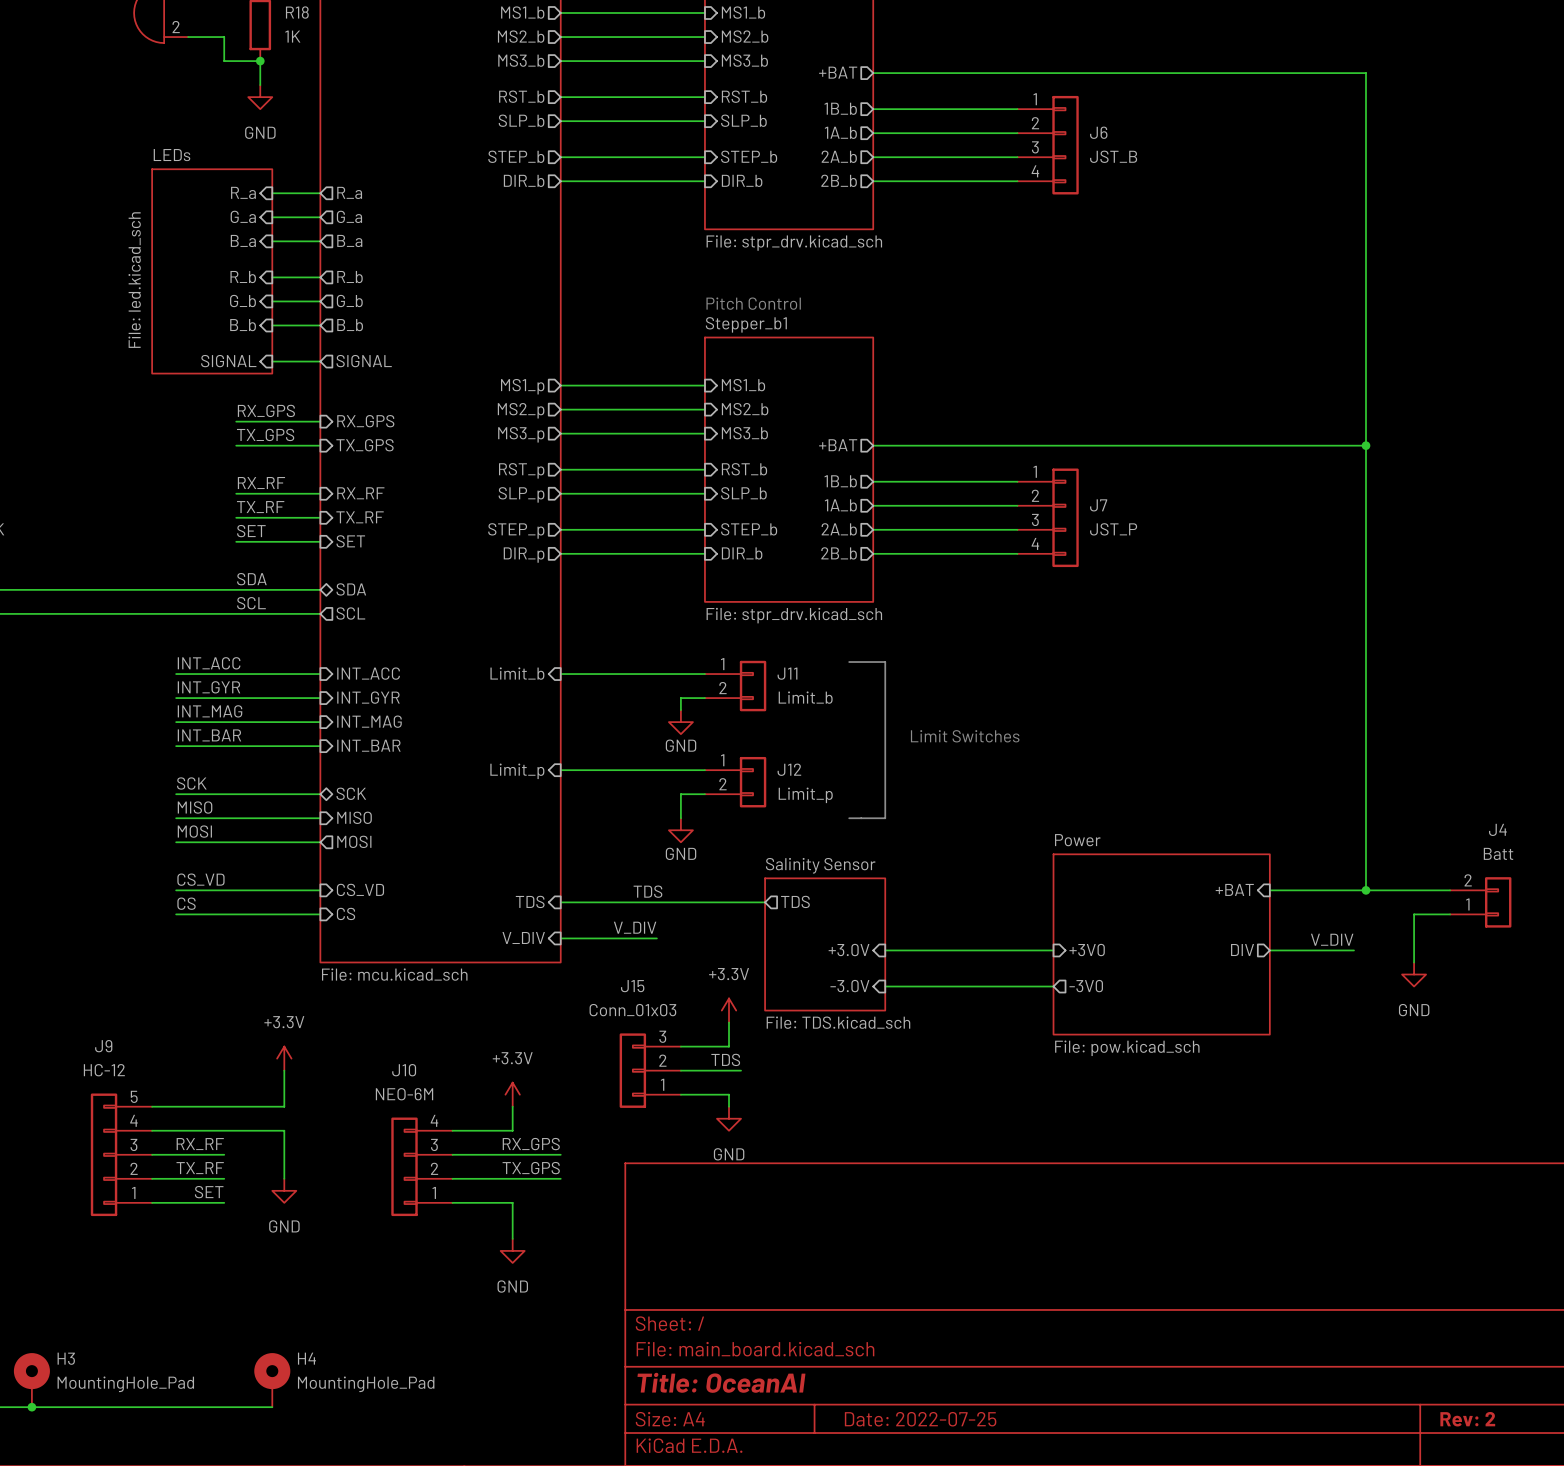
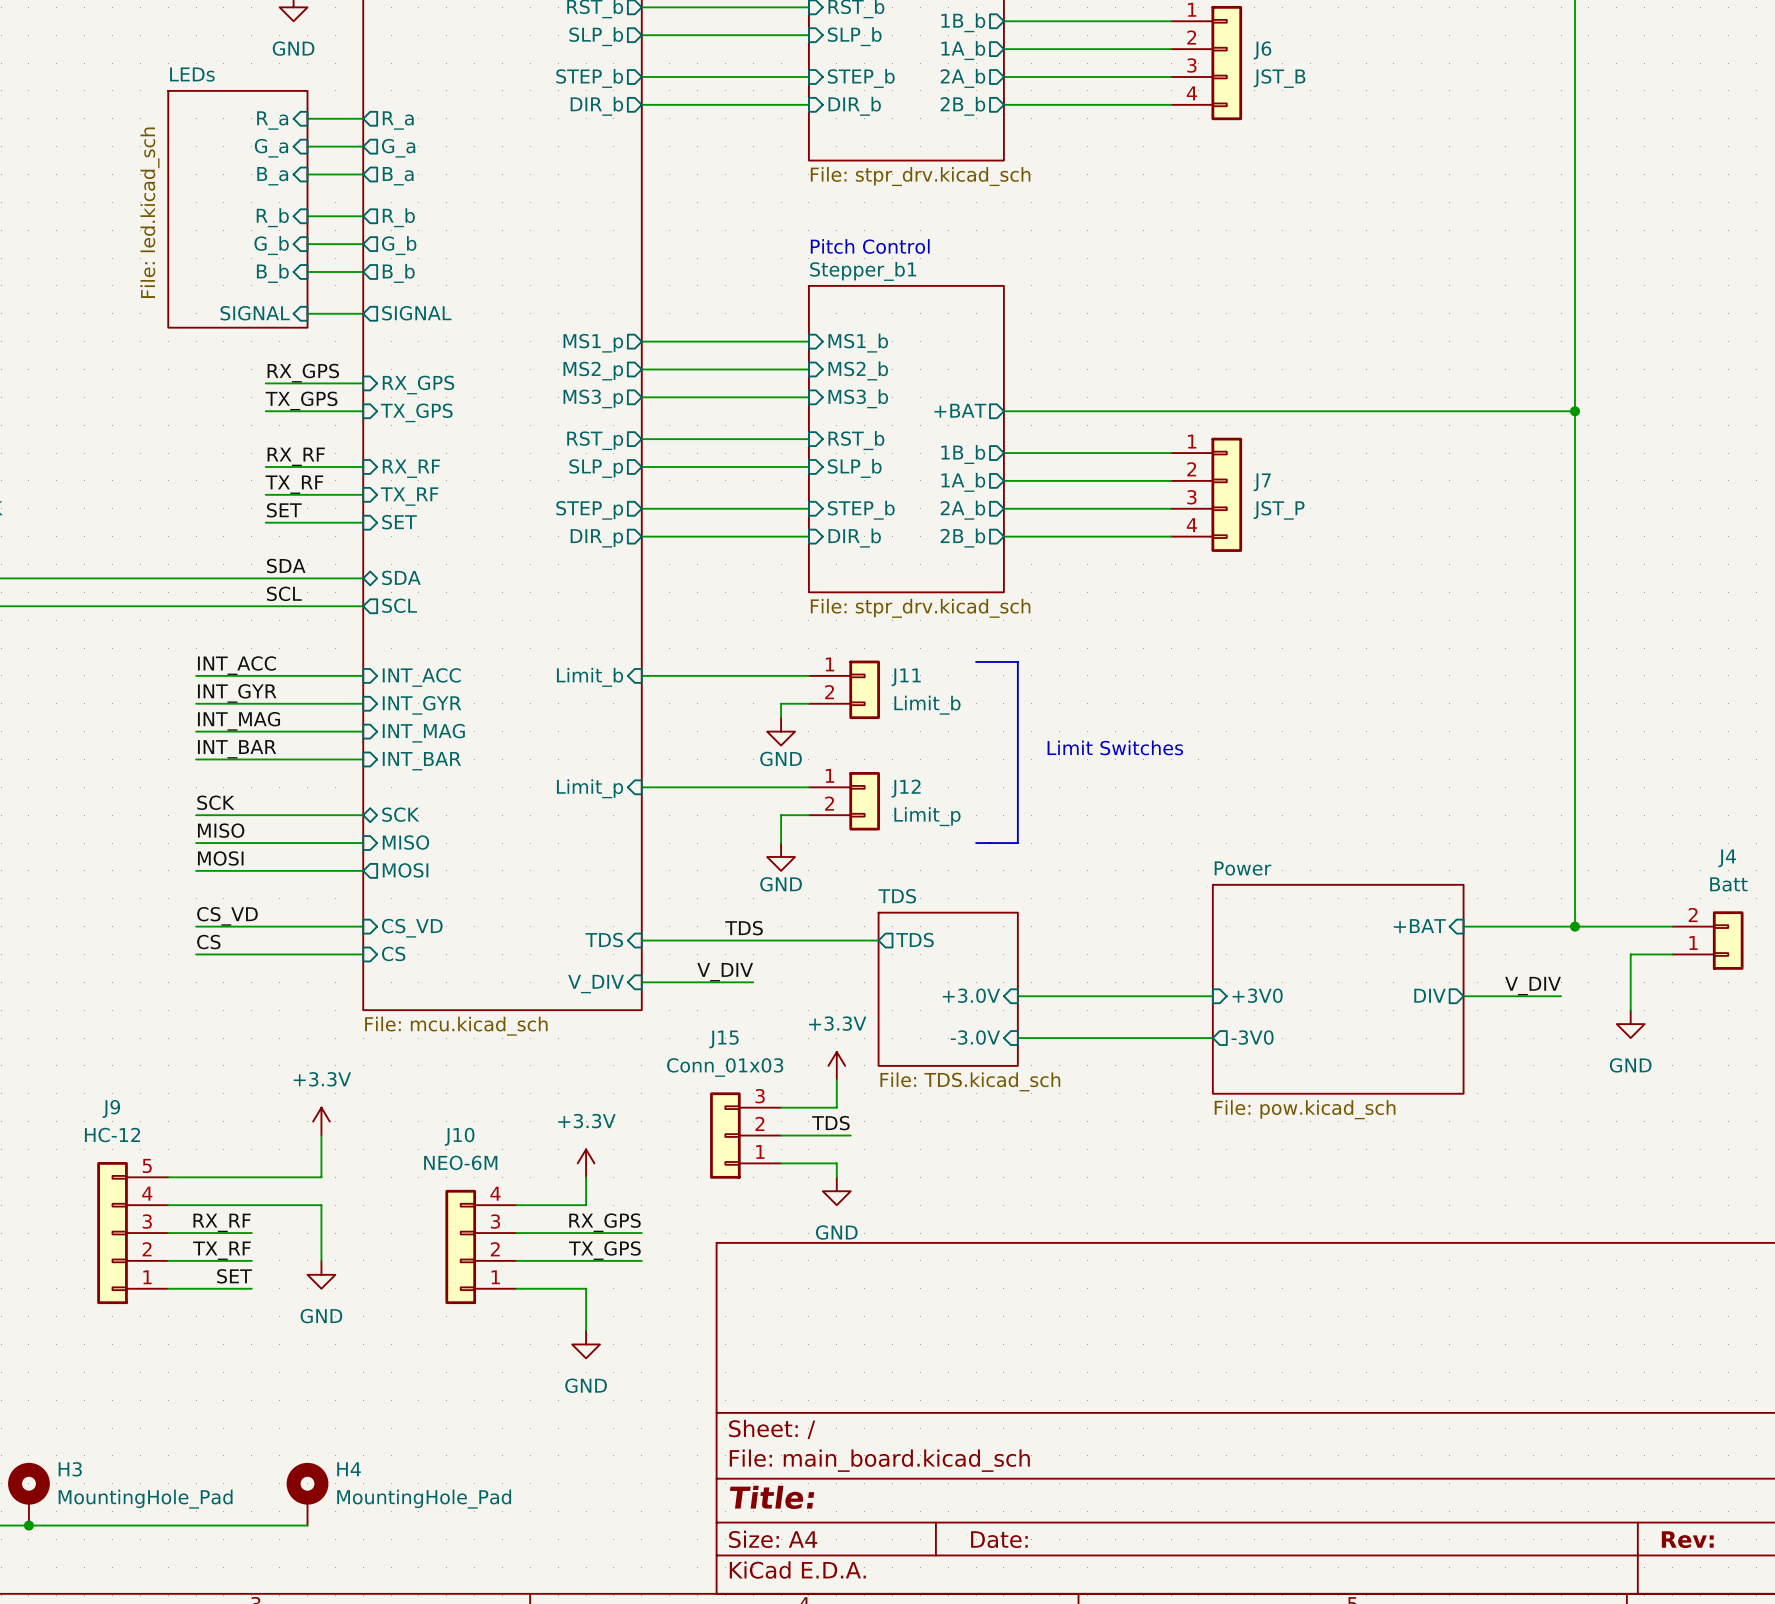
sheet Salinity Sensor name: Salinity Sensor (820, 865) -> TDS (897, 896)
title block: Title: OceanAI (721, 1382) -> Title: (772, 1497)
title block: Date: 2022-07-25 (920, 1419) -> Date: (999, 1539)
title block: Rev: 2 (1467, 1419) -> Rev: (1687, 1539)

